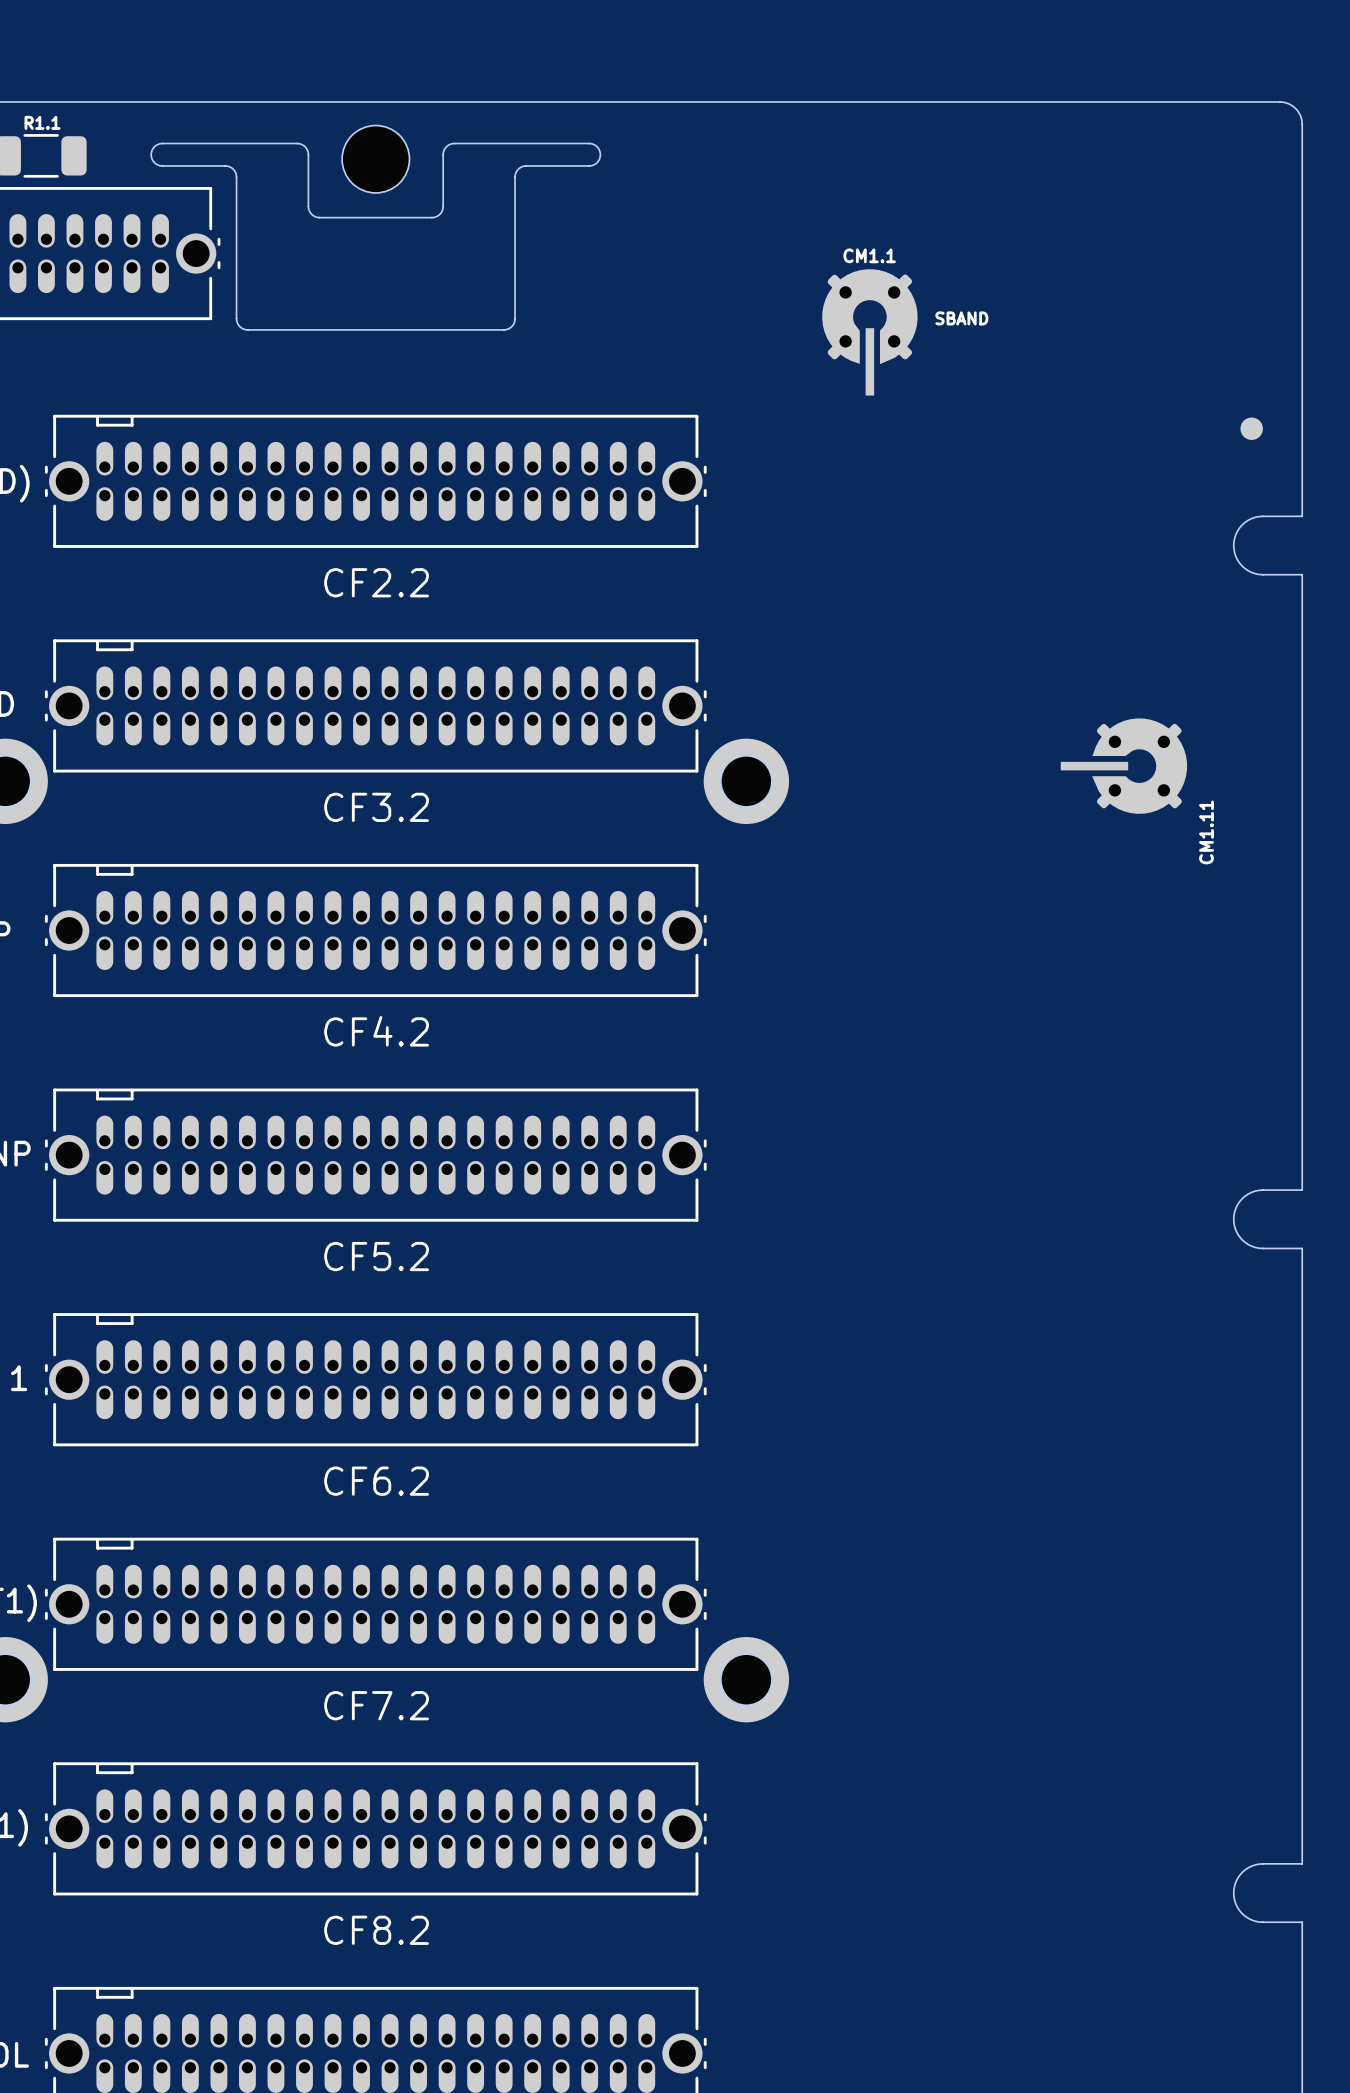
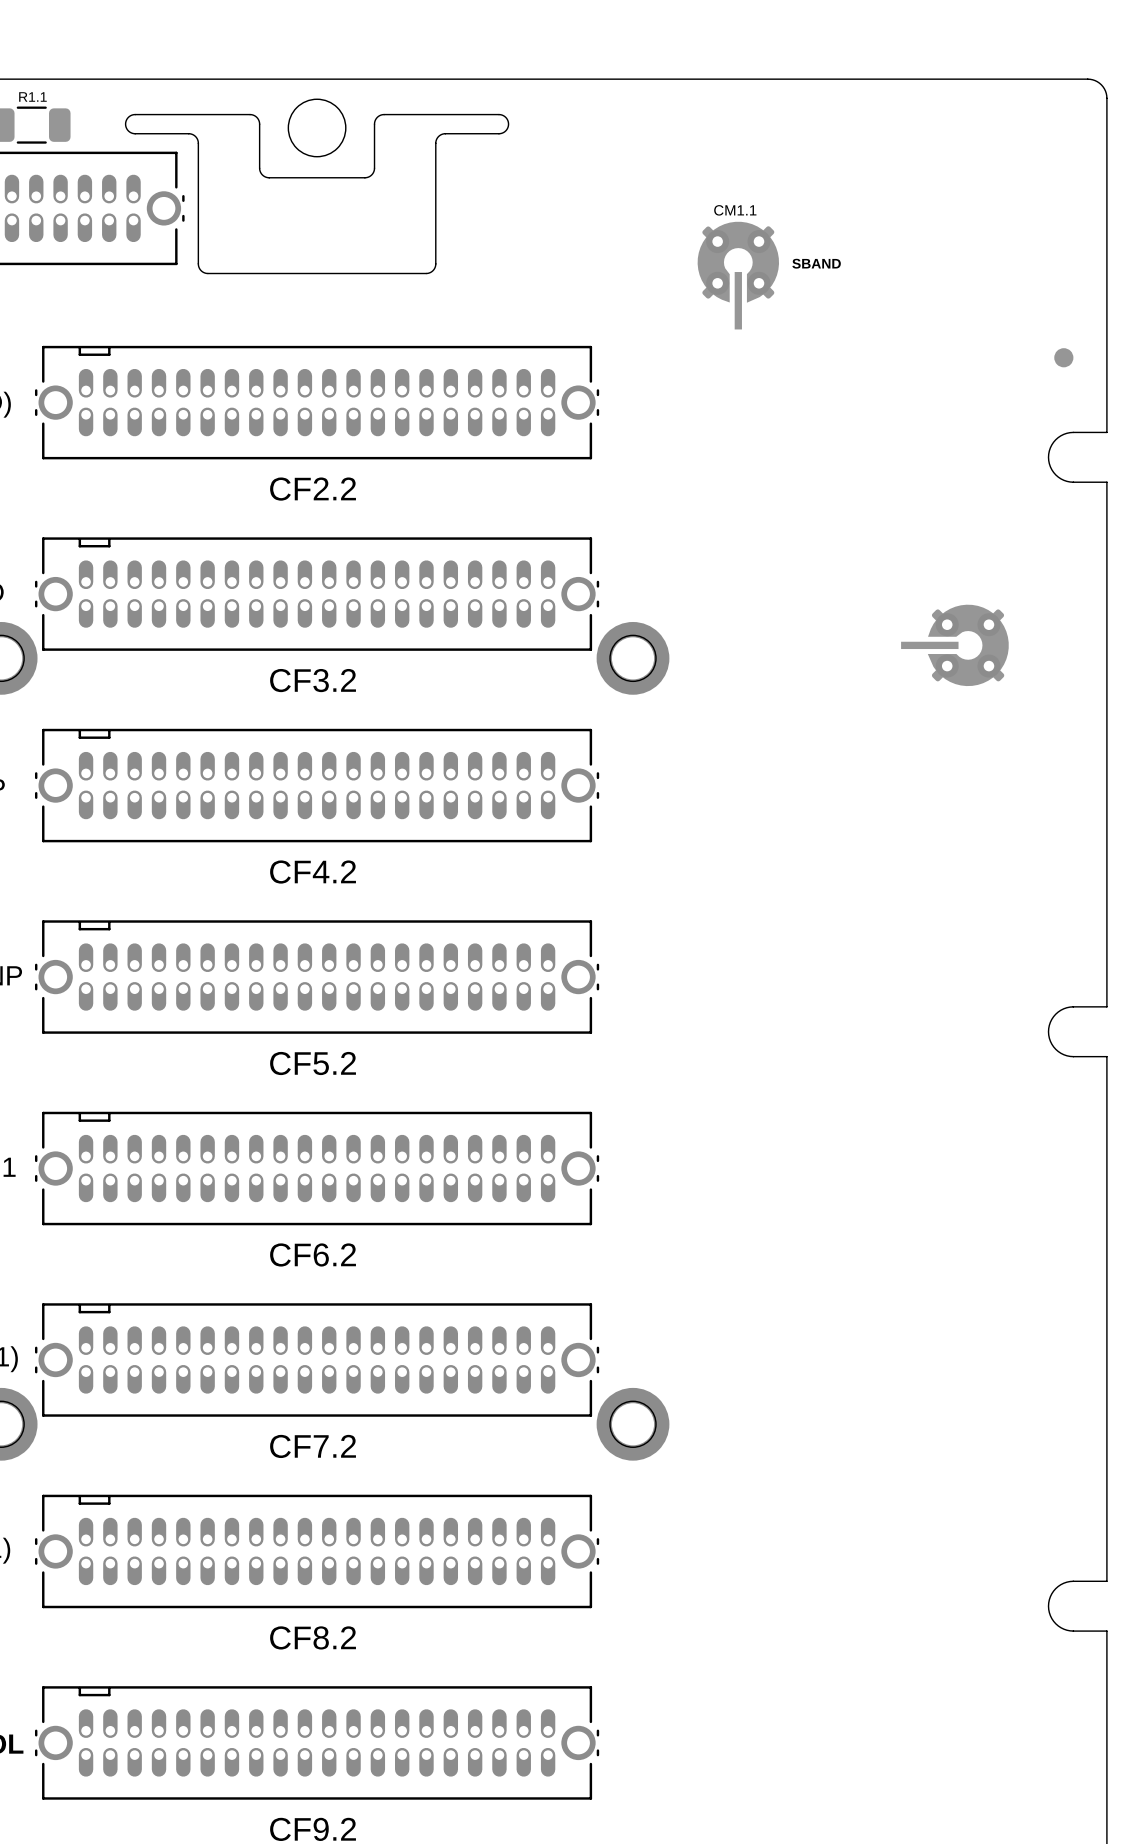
CM1.11 name: CM1.11 (1206, 832) -> none

